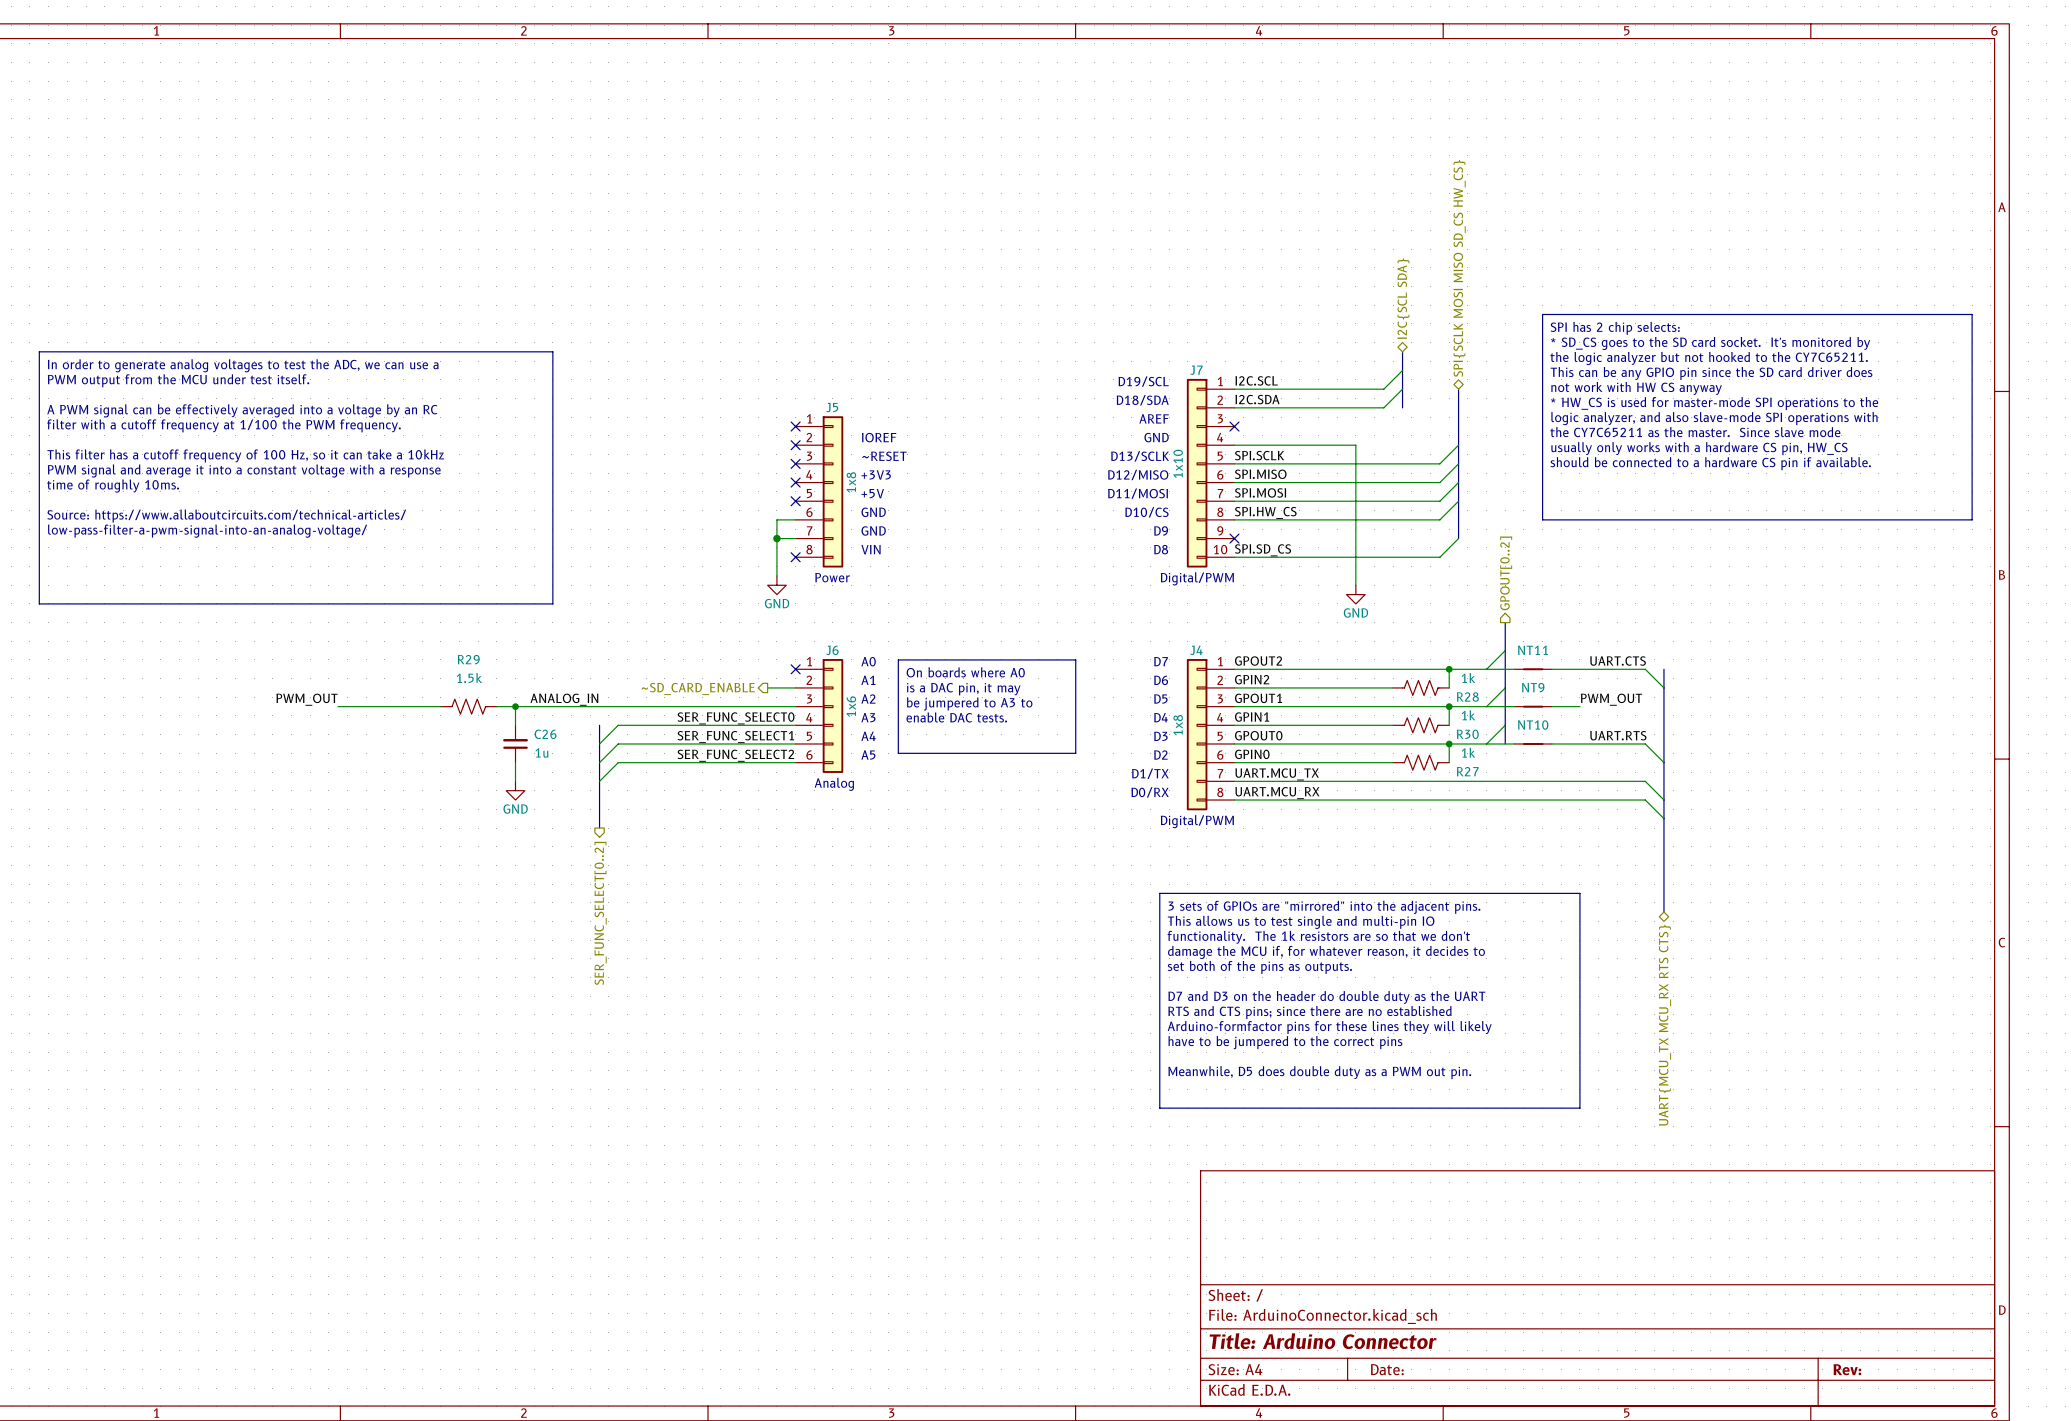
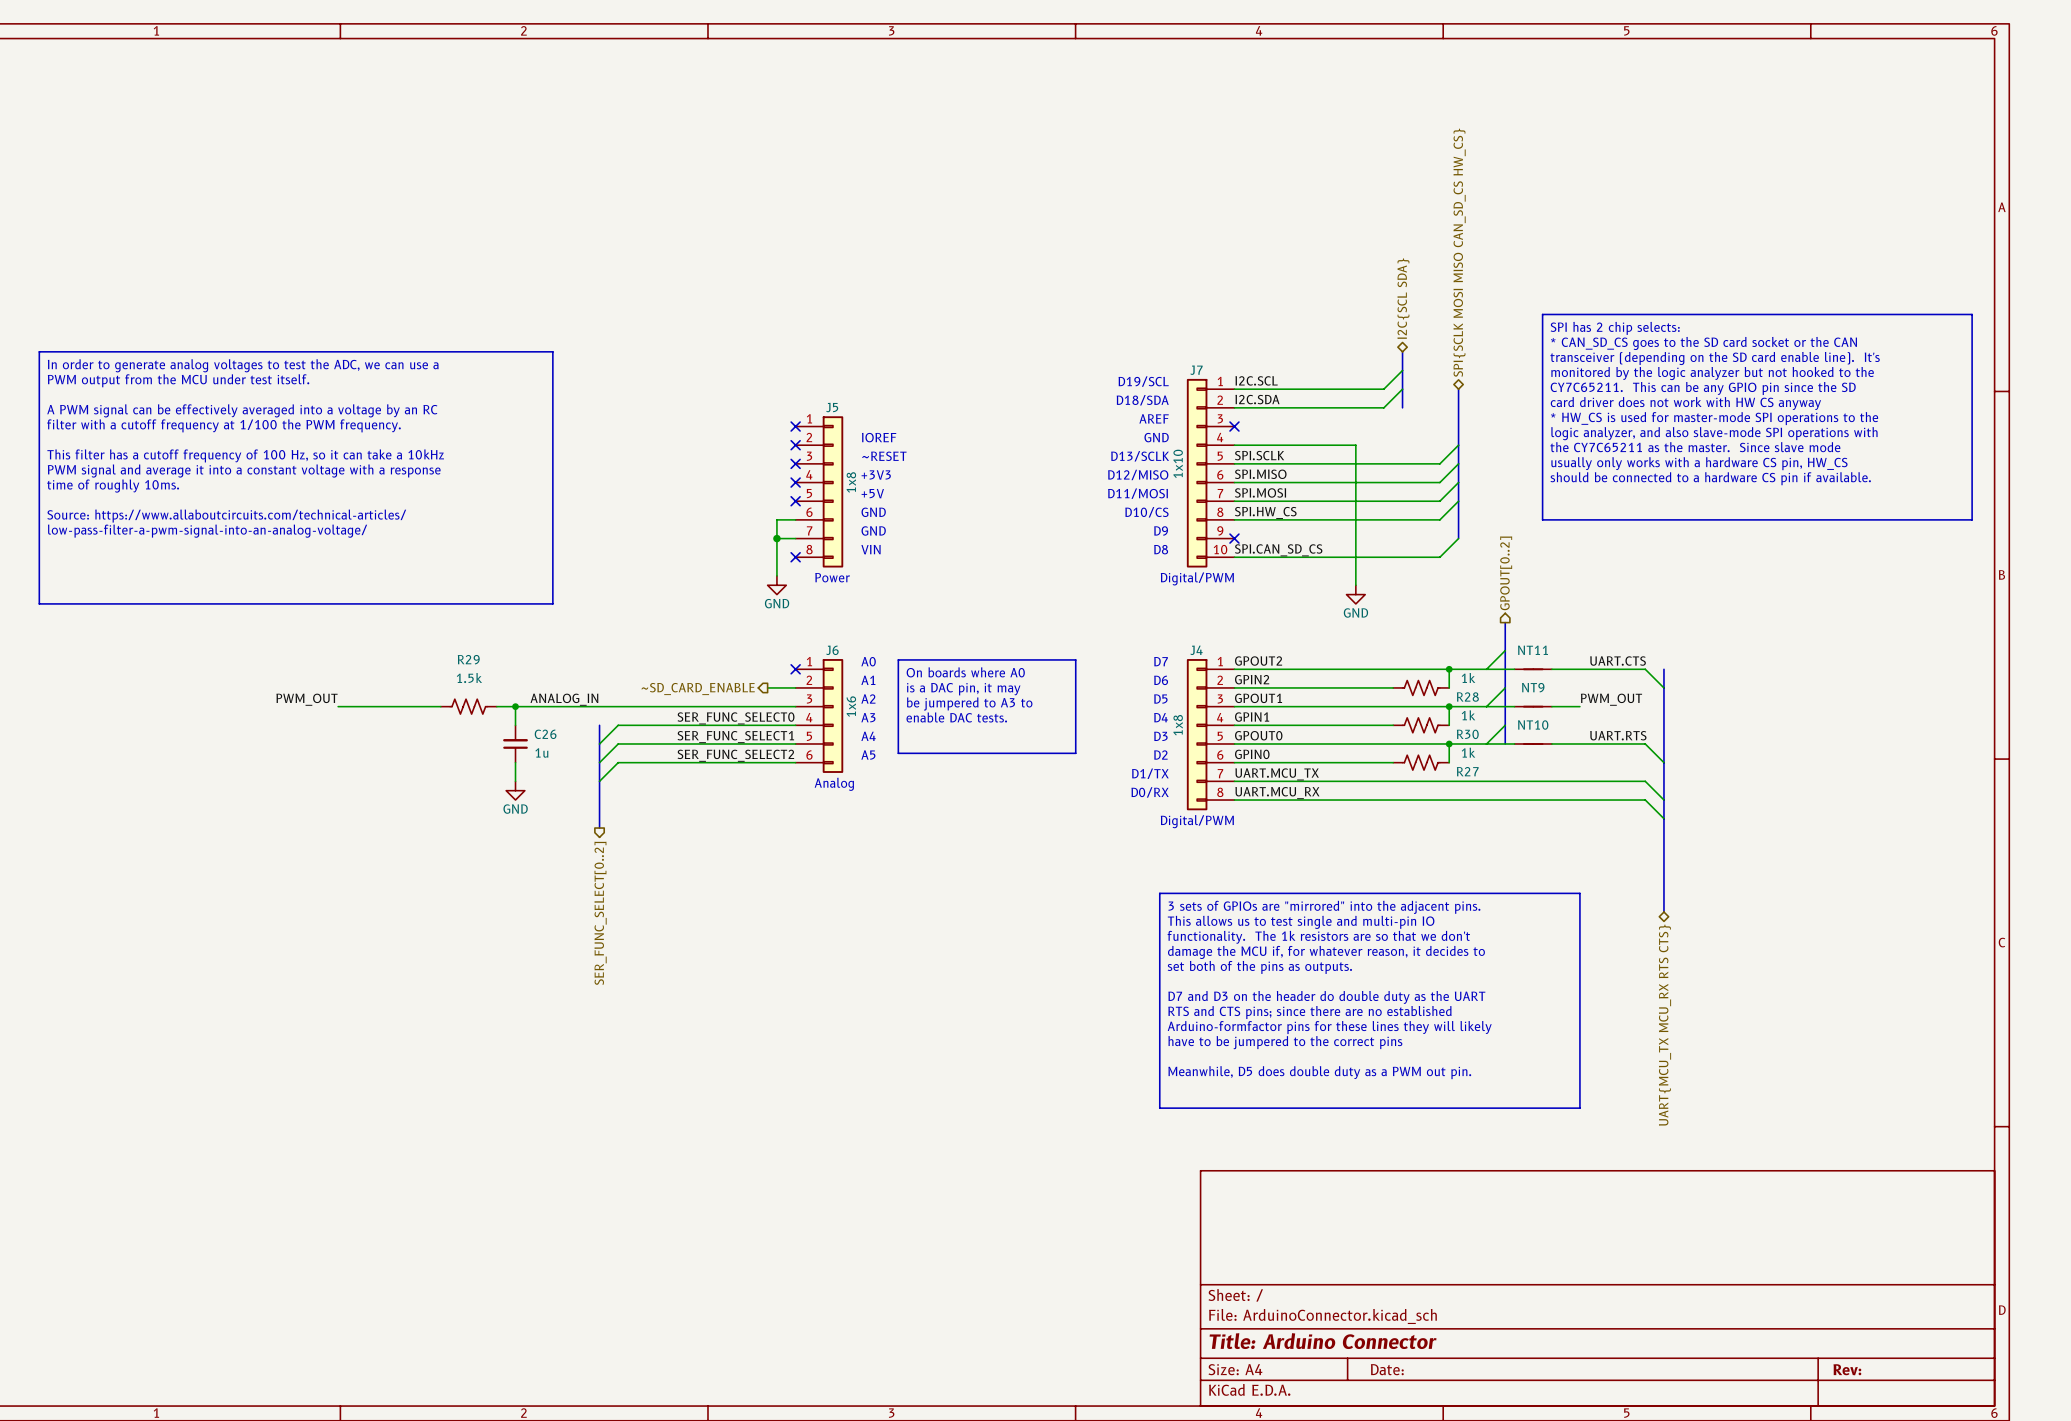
hierarchical label: SPI{SCLK MOSI MISO SD_CS HW_CS} (1459, 268) -> SPI{SCLK MOSI MISO CAN_SD_CS HW_CS} (1459, 252)
text: * SD_CS goes to the SD card socket. It's monitored by (1710, 343) -> * CAN_SD_CS goes to the SD card socket or the CAN (1703, 343)
text: the logic analyzer but not hooked to the CY7C65211. (1709, 358) -> transceiver (depending on the SD card enable line). It's (1715, 358)
text: This can be any GPIO pin since the SD card driver does (1711, 373) -> monitored by the logic analyzer but not hooked to the (1712, 373)
text: not work with HW CS anyway (1636, 388) -> CY7C65211. This can be any GPIO pin since the SD (1703, 388)
text: * HW_CS is used for master-mode SPI operations to the (1714, 403) -> card driver does not work with HW CS anyway (1685, 403)
text: logic analyzer, and also slave-mode SPI operations with (1714, 418) -> * HW_CS is used for master-mode SPI operations to the (1714, 418)
text: the CY7C65211 as the master. Since slave mode (1695, 432) -> logic analyzer, and also slave-mode SPI operations with (1714, 433)
text: usually only works with a hardware CS pin, HW_CS (1699, 448) -> the CY7C65211 as the master. Since slave mode (1695, 447)
text: should be connected to a hardware CS pin if available. (1710, 463) -> usually only works with a hardware CS pin, HW_CS (1699, 463)
text: none -> should be connected to a hardware CS pin if available. (1710, 478)
label: SPI.SD_CS (1263, 550) -> SPI.CAN_SD_CS (1278, 550)

